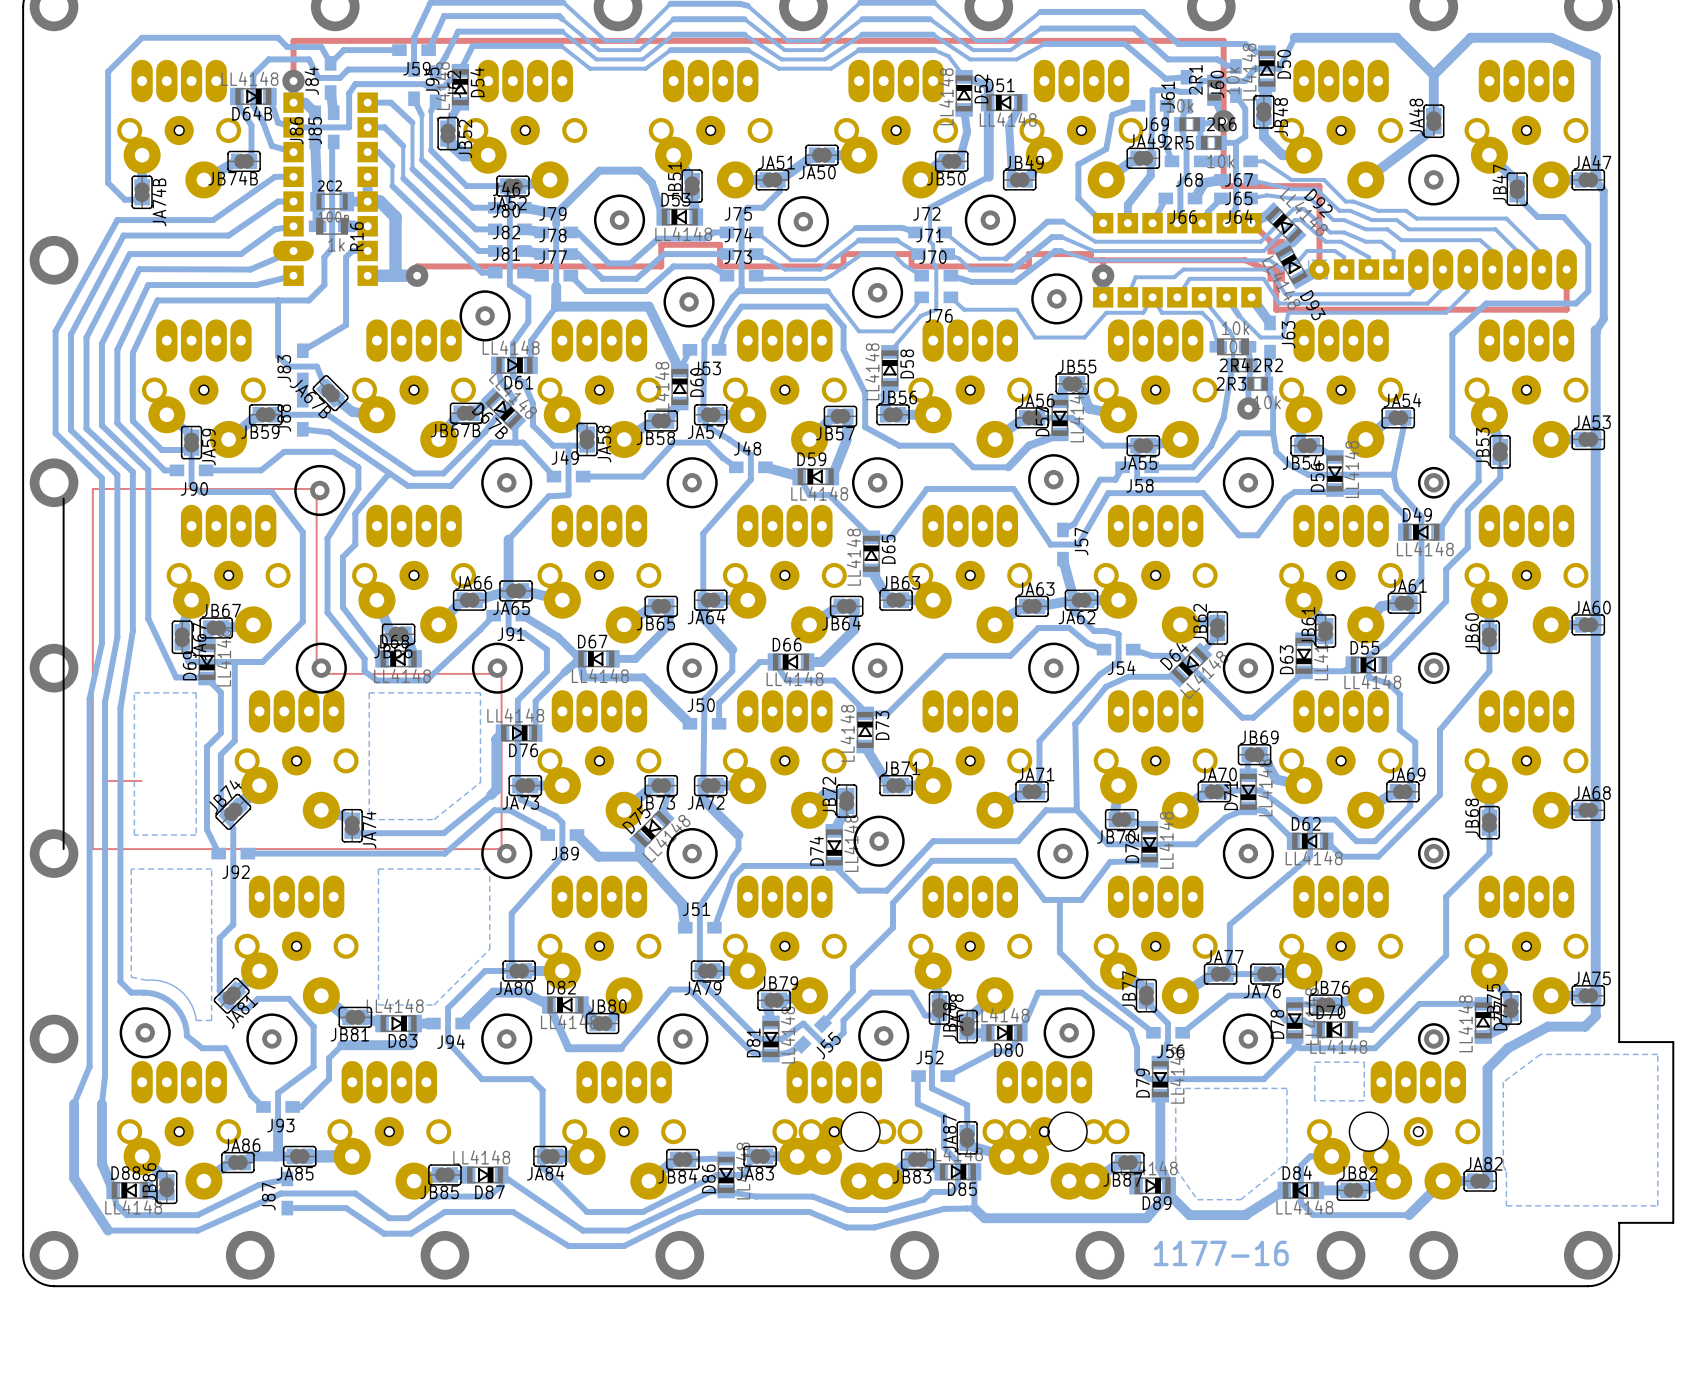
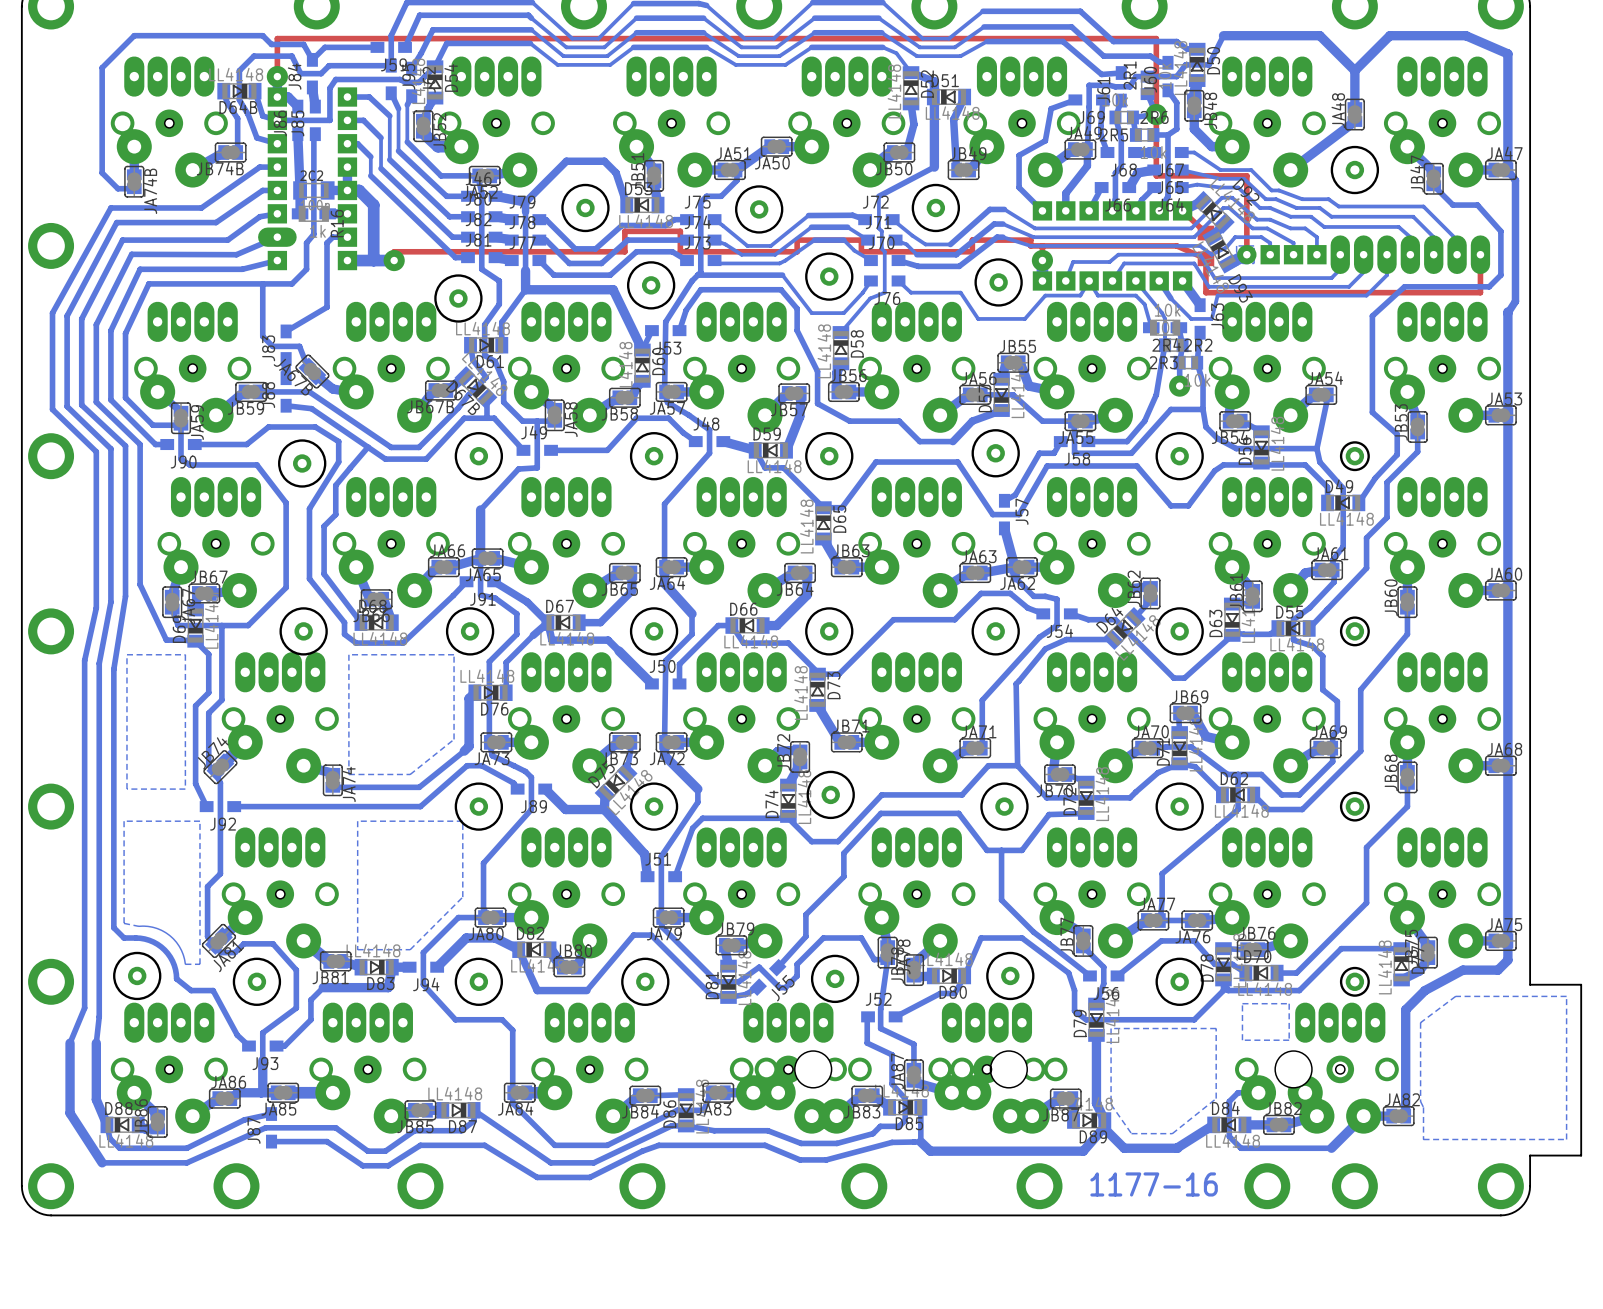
drawing: [62, 488, 503, 851] -> none

